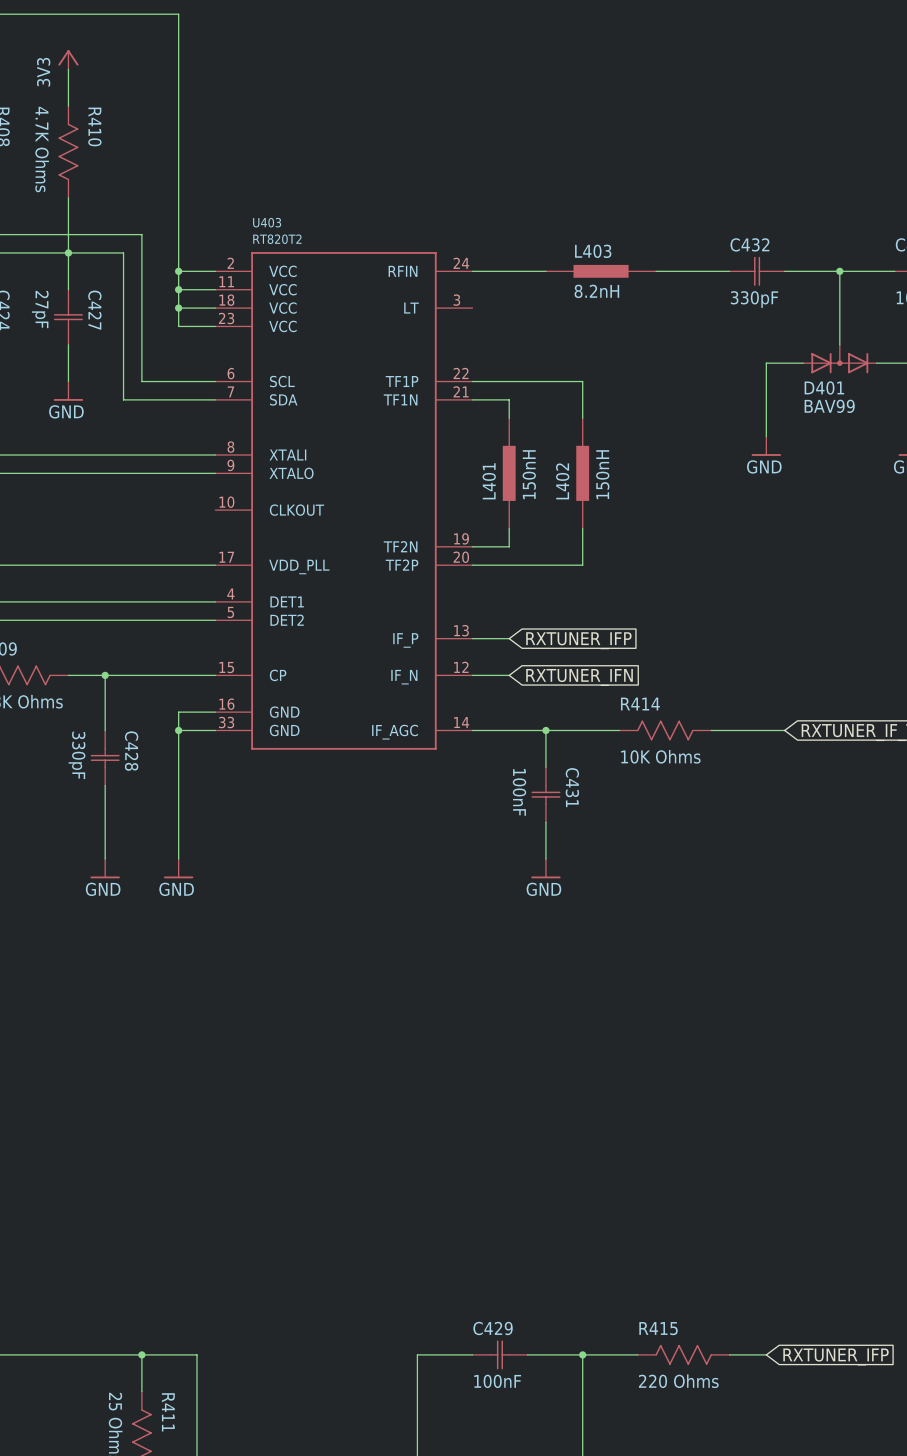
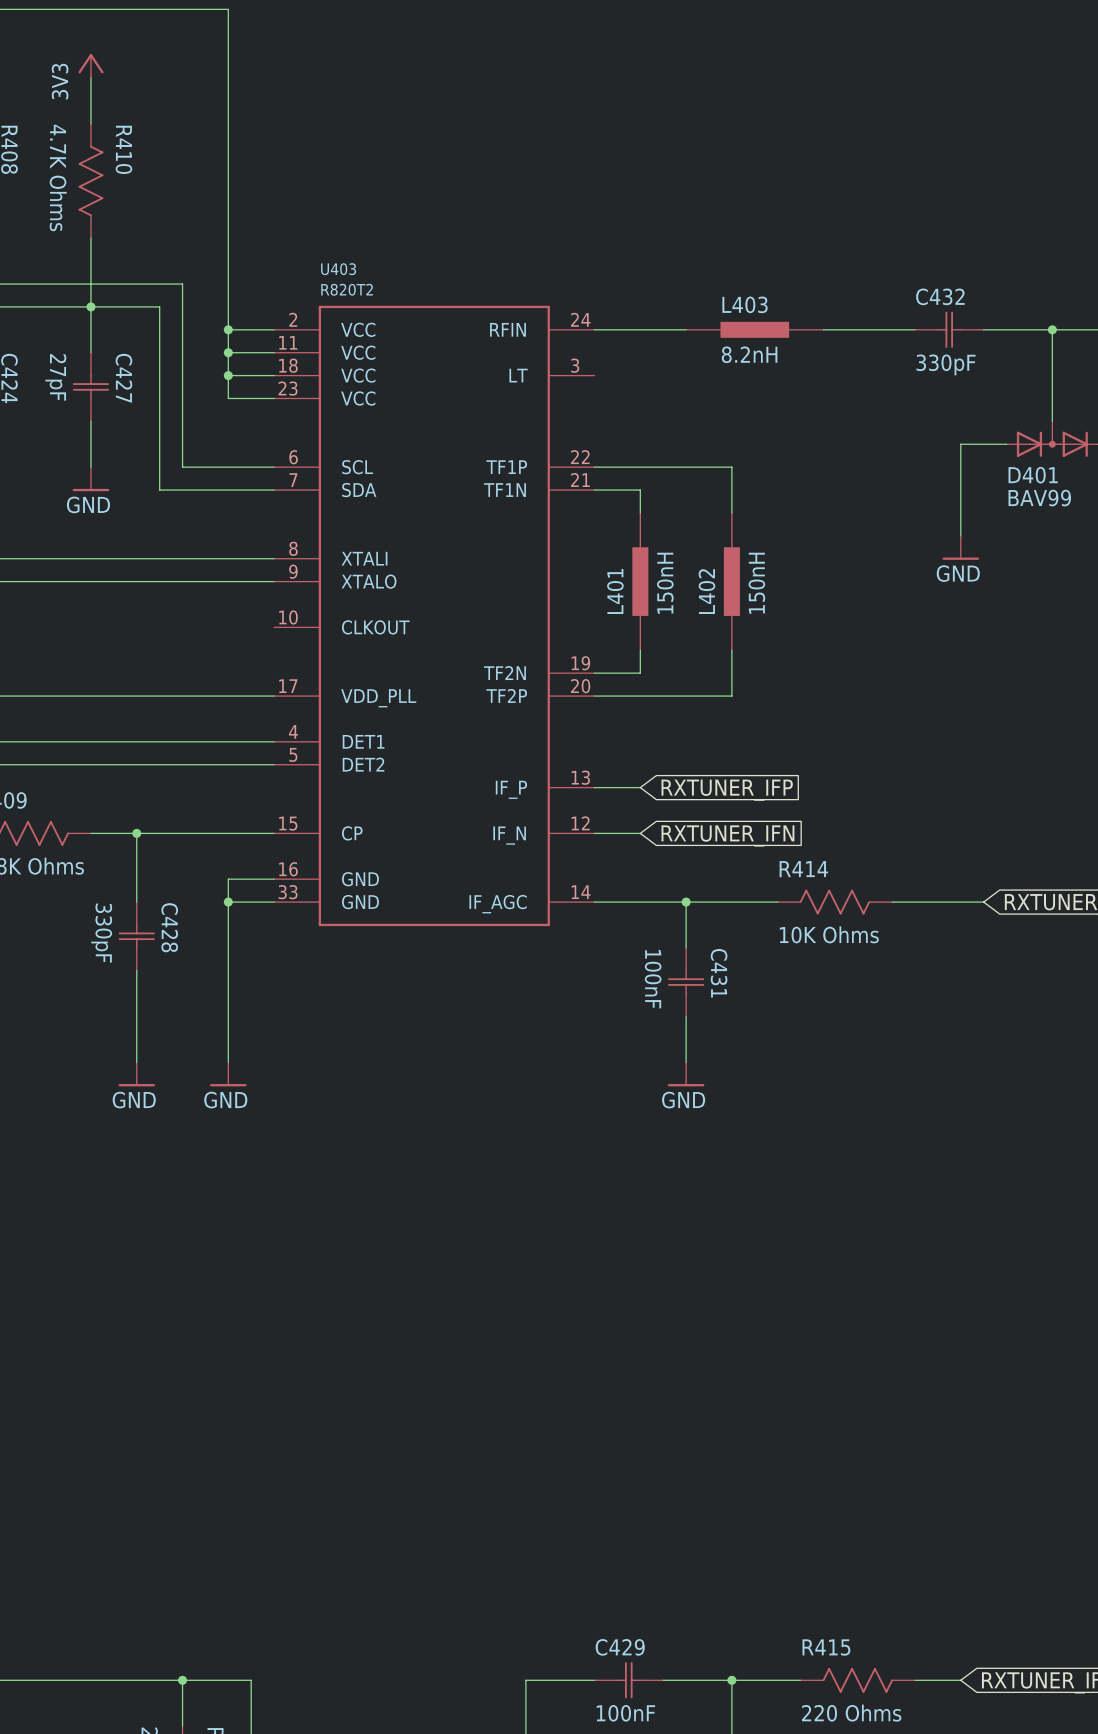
U403 value: RT820T2 (277, 239) -> R820T2 (347, 289)

